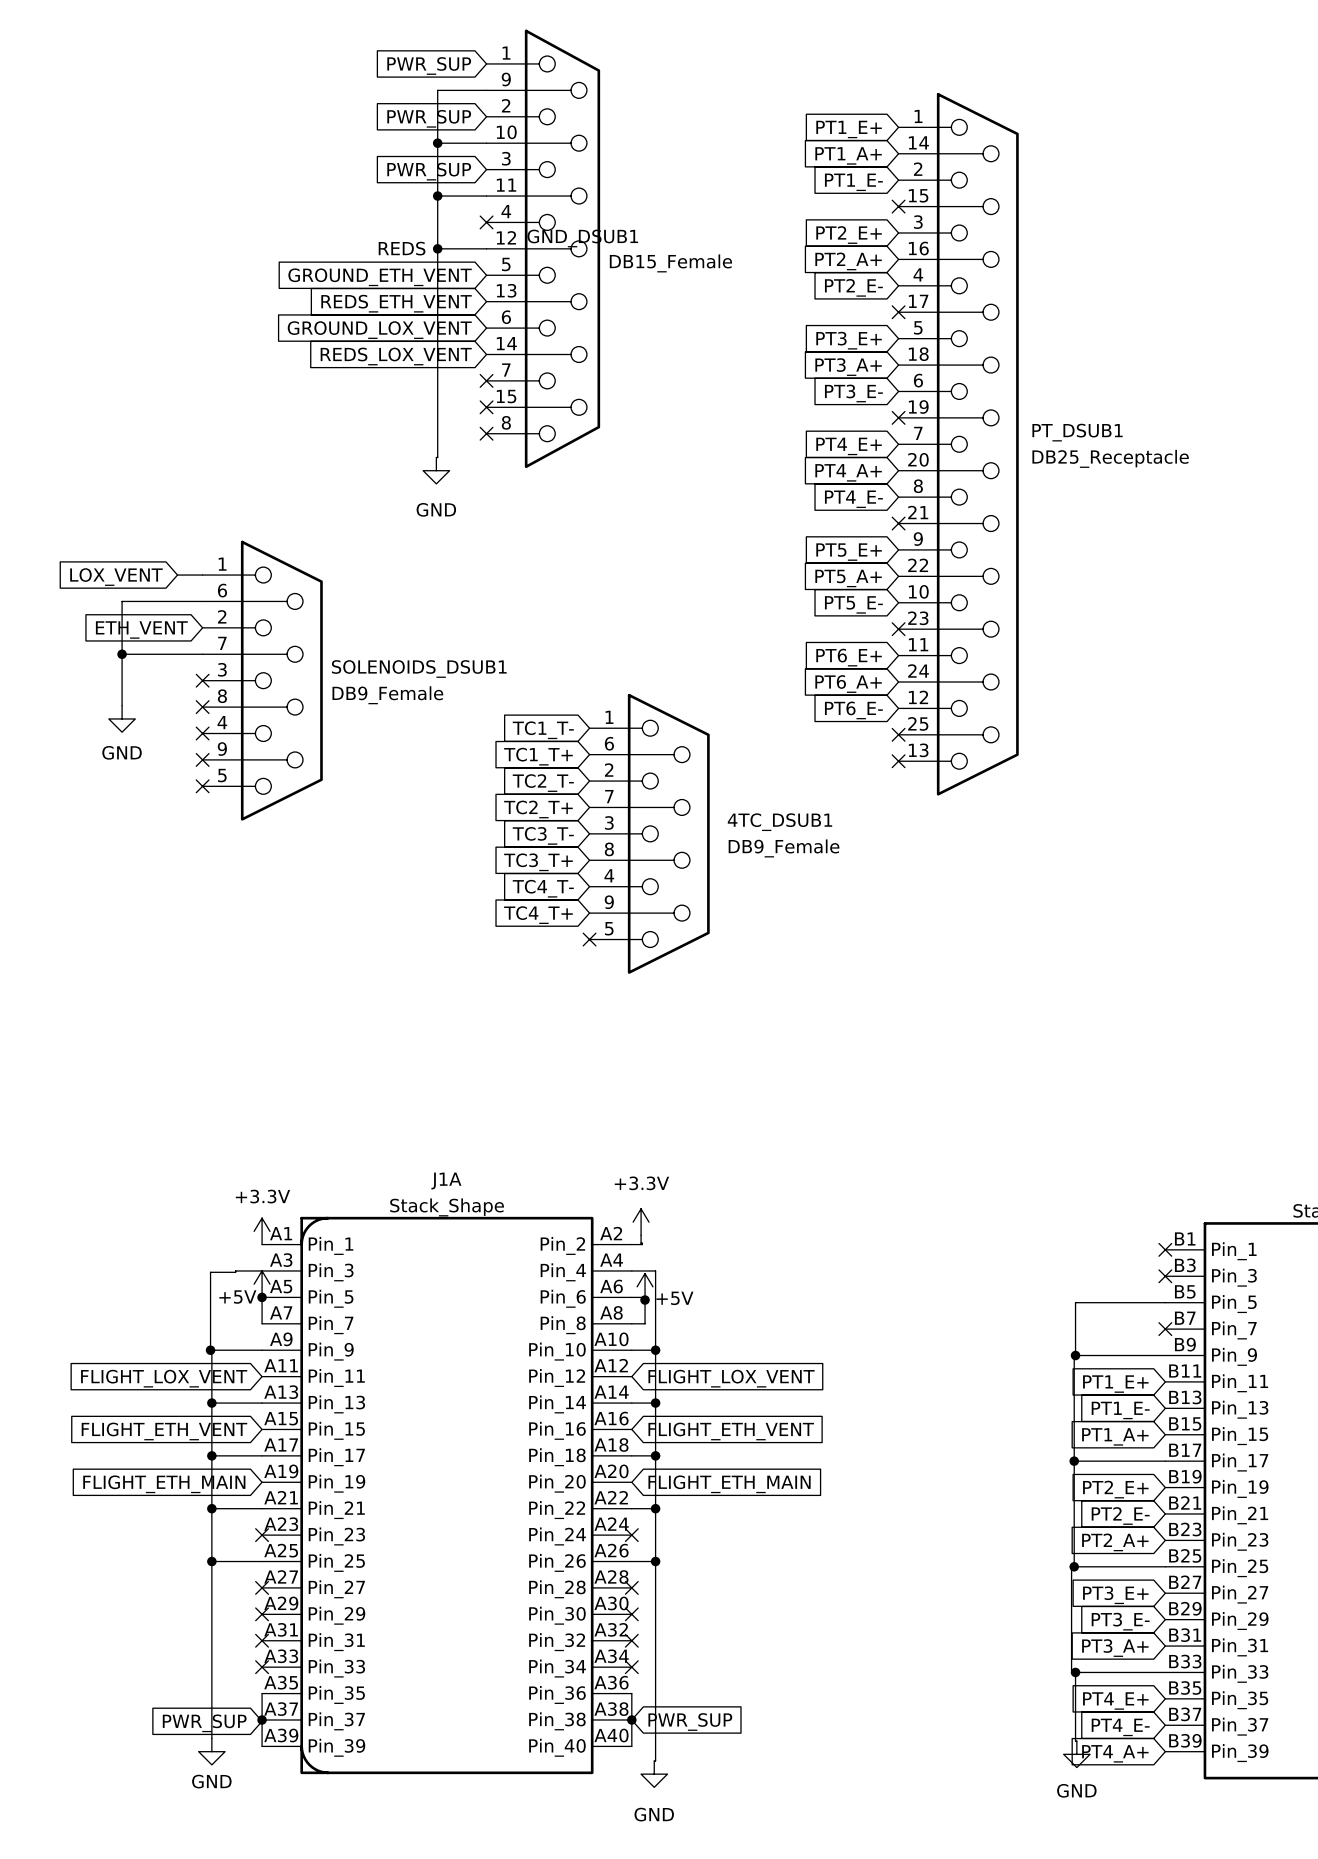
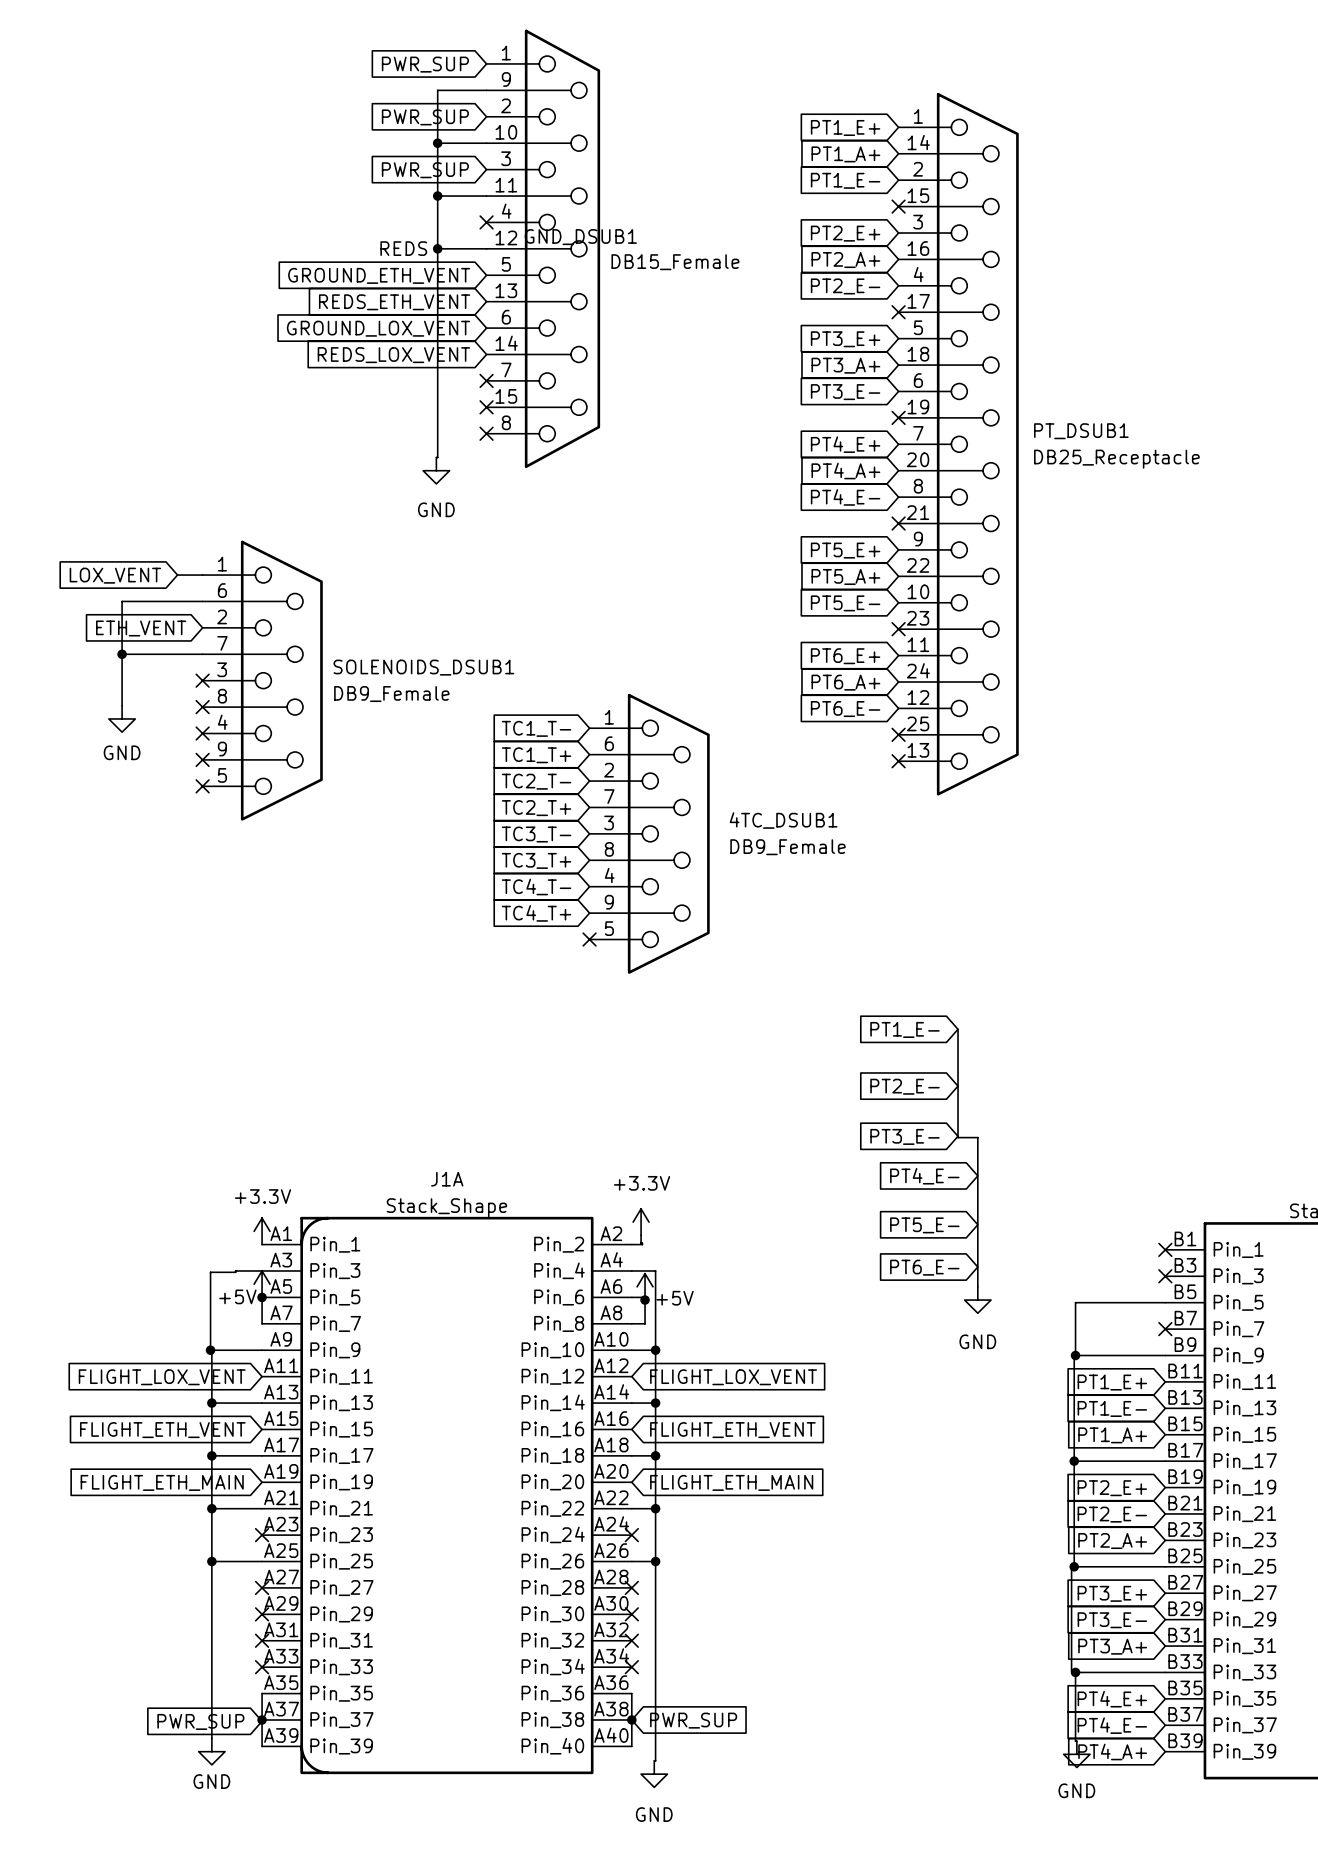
wire: none -> (958, 1029) (958, 1137) (977, 1137) (977, 1286)
global label: none -> PT1_E- (905, 1029)
global label: none -> PT2_E- (905, 1086)
global label: none -> PT3_E- (905, 1136)
global label: none -> PT4_E- (924, 1176)
global label: none -> PT5_E- (924, 1225)
global label: none -> PT6_E- (924, 1267)
power symbol: none -> GND (977, 1300)

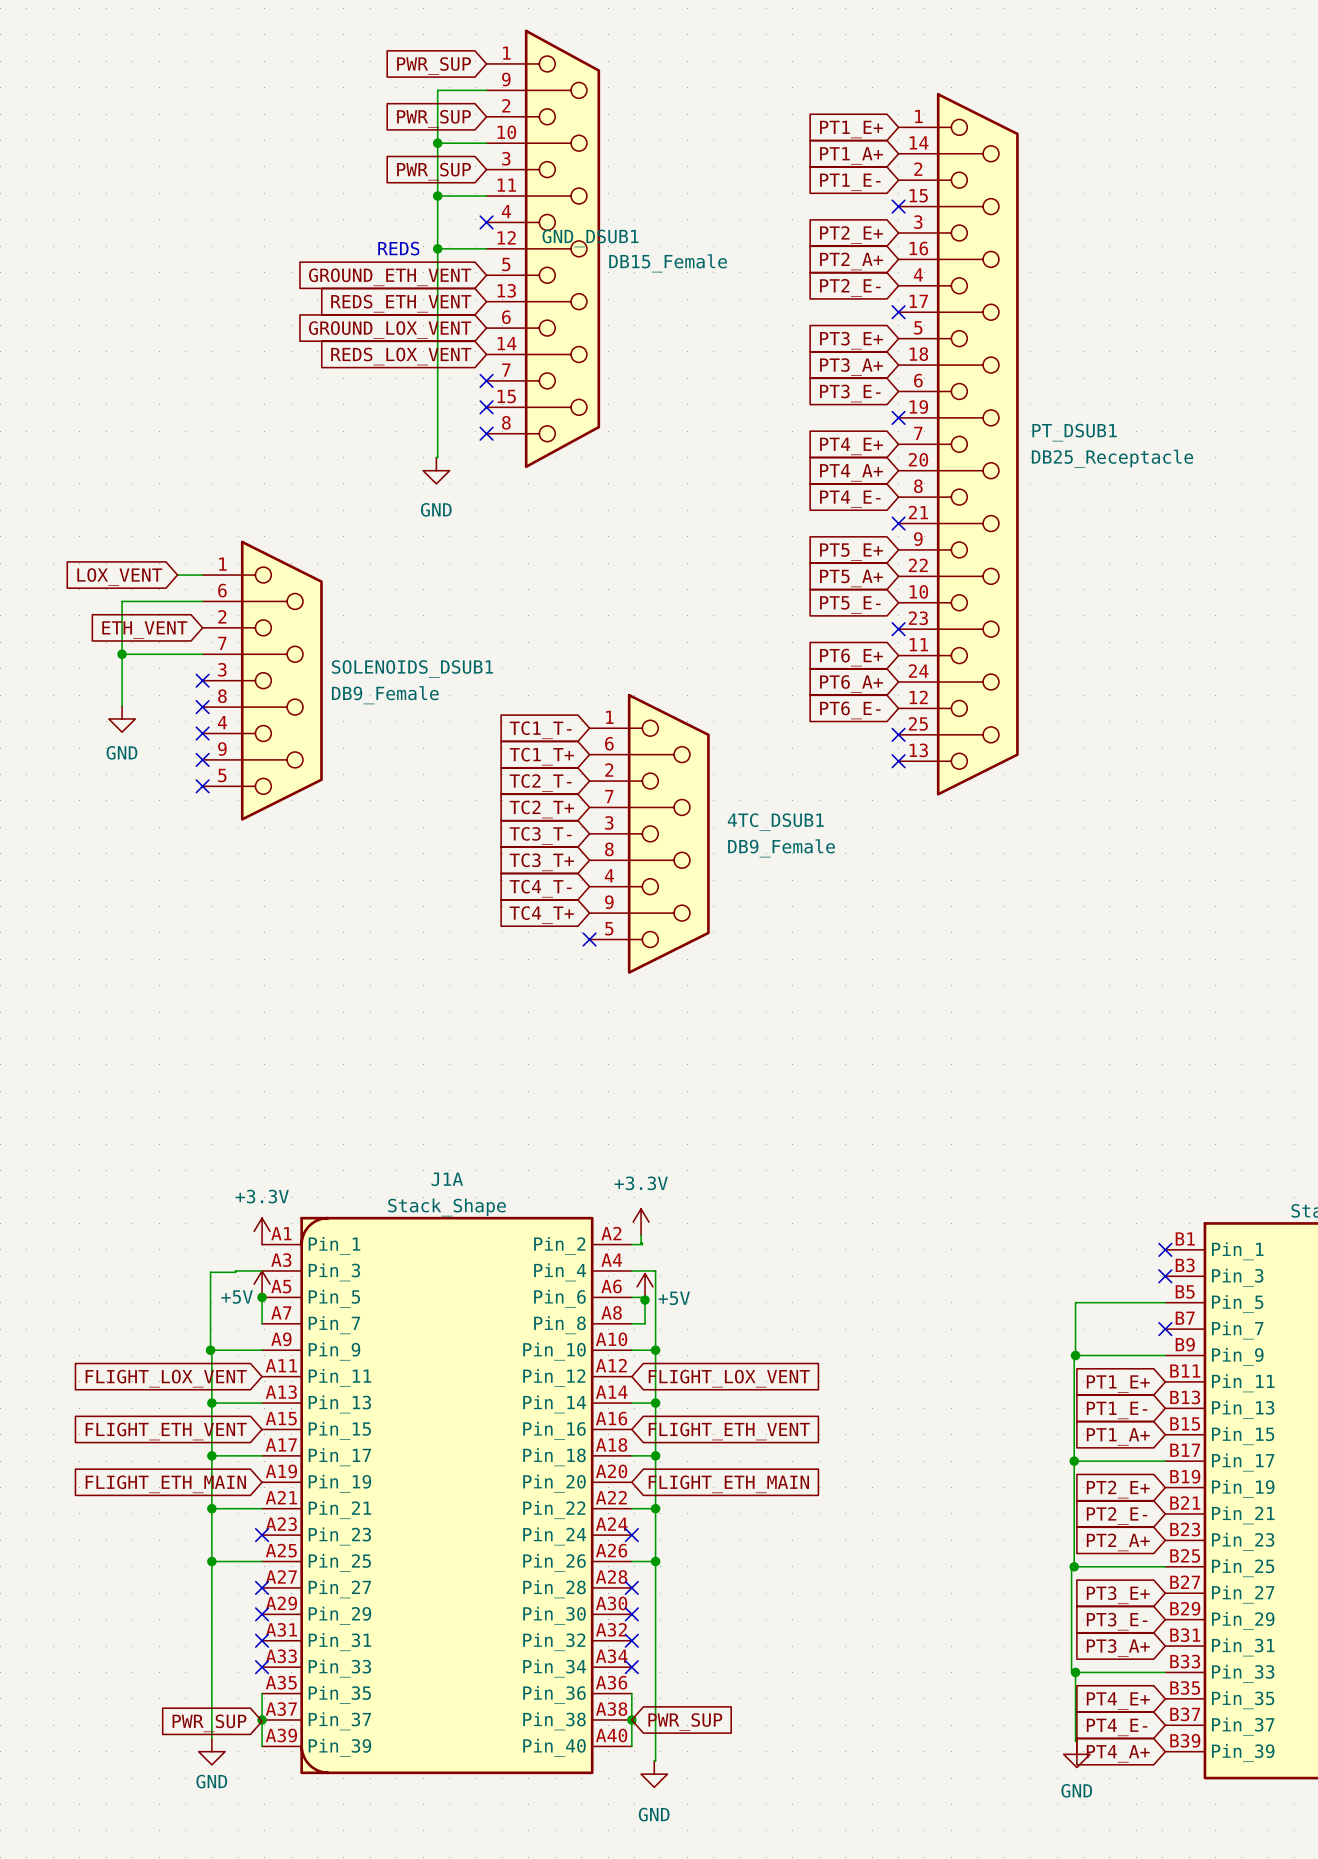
global label: PT1_E- (905, 1029) -> none
wire: (958, 1029) (958, 1137) (977, 1137) (977, 1286) -> none
global label: PT2_E- (905, 1086) -> none
global label: PT3_E- (905, 1136) -> none
global label: PT4_E- (924, 1176) -> none
global label: PT5_E- (924, 1225) -> none
global label: PT6_E- (924, 1267) -> none
power symbol: GND (977, 1300) -> none

